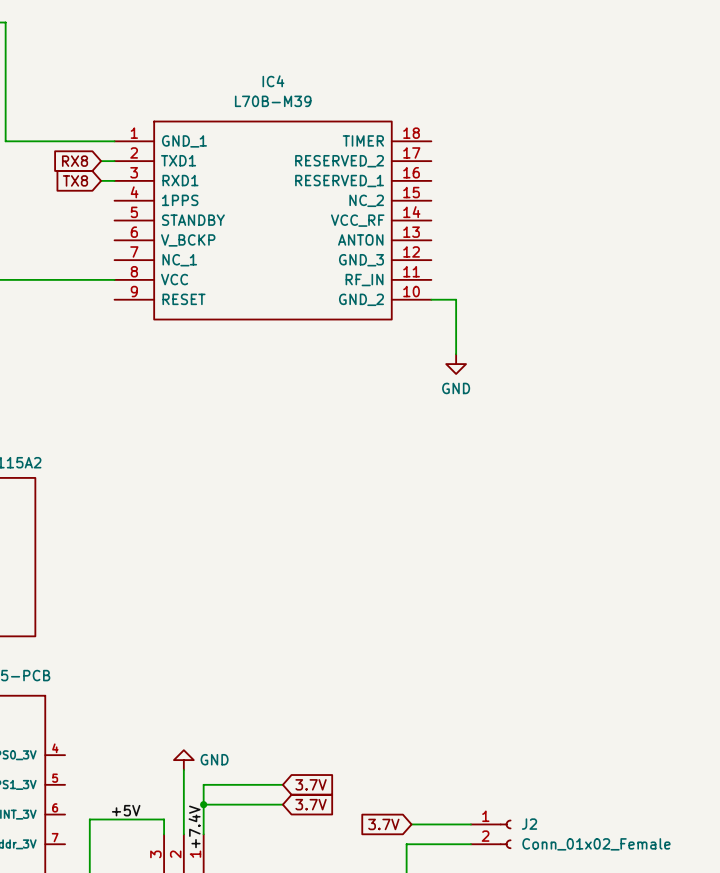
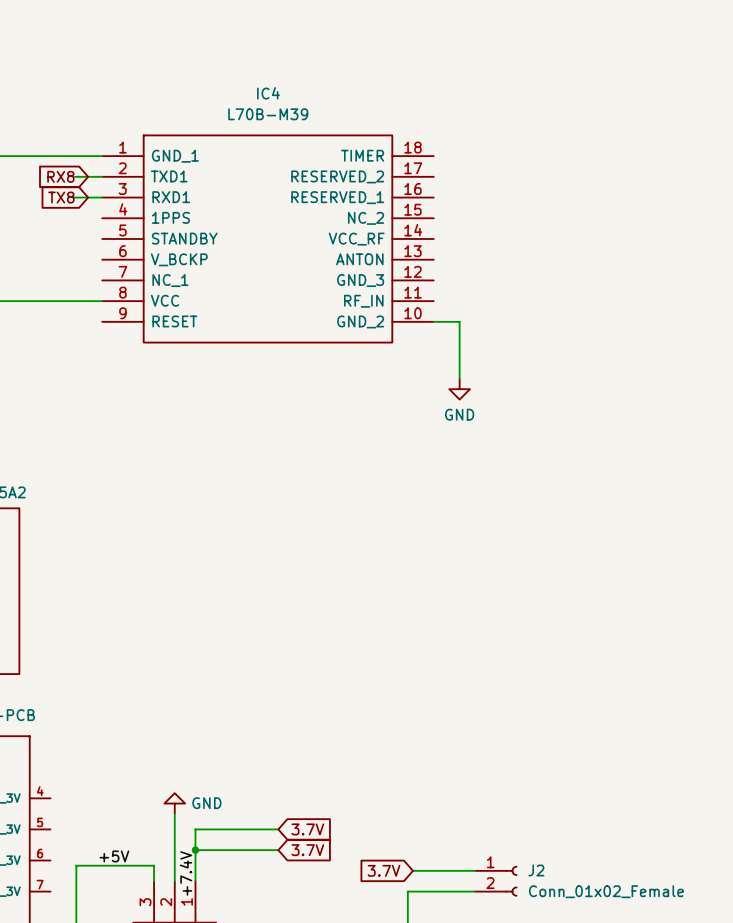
wire: none -> (74, 176) (88, 176)
wire: none -> (74, 197) (88, 197)

